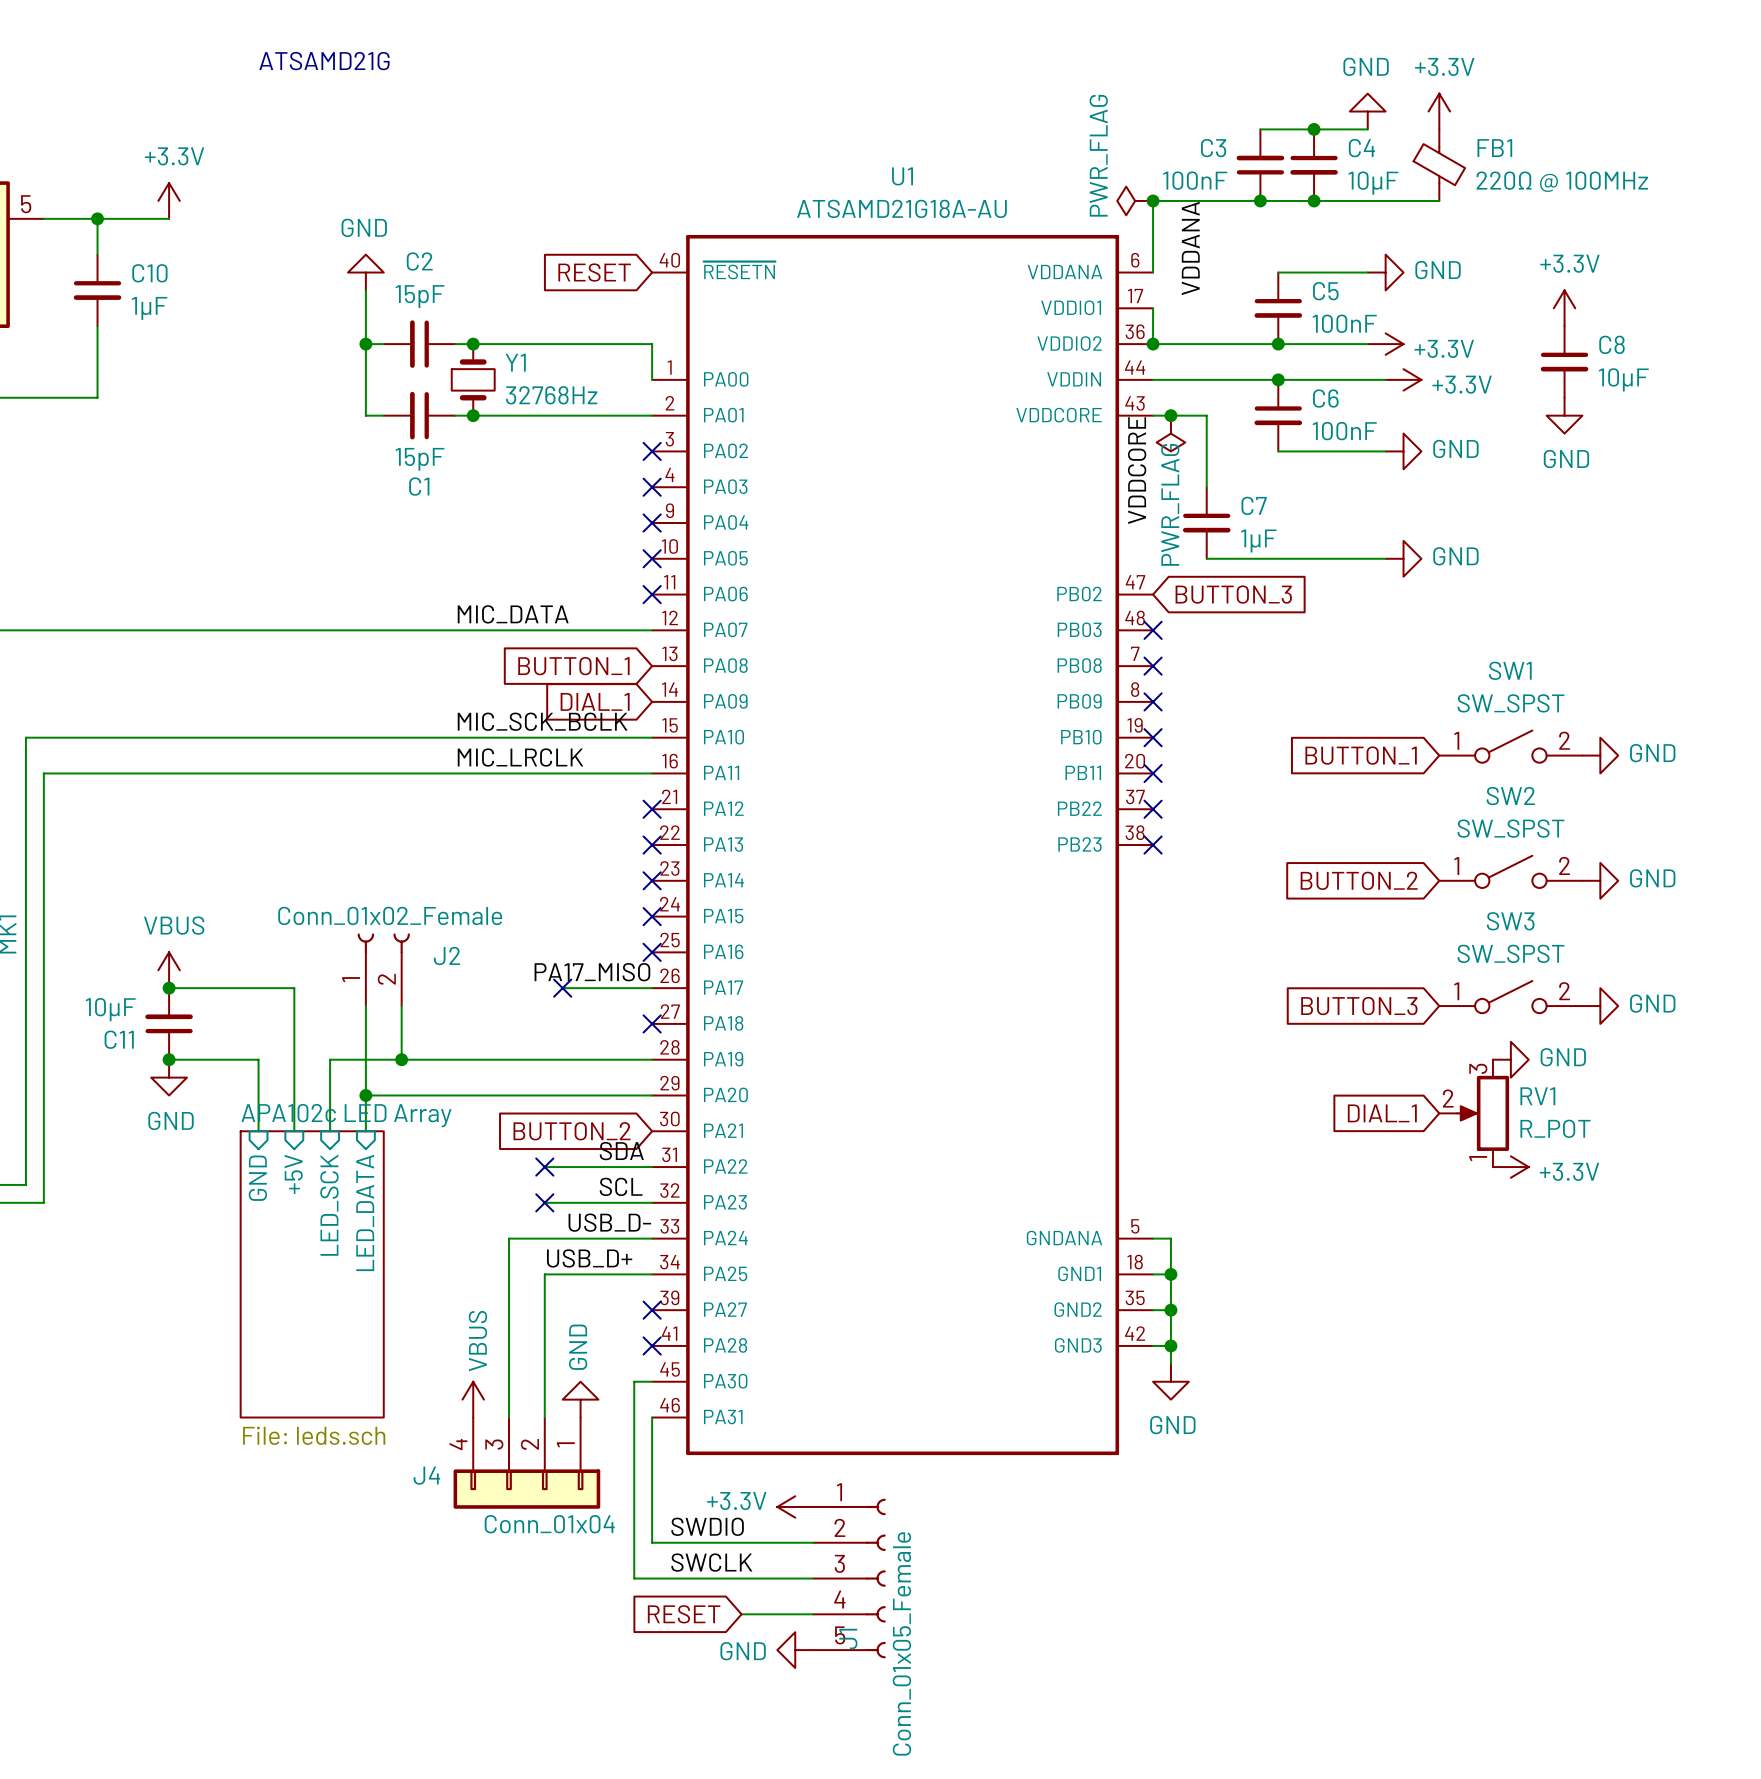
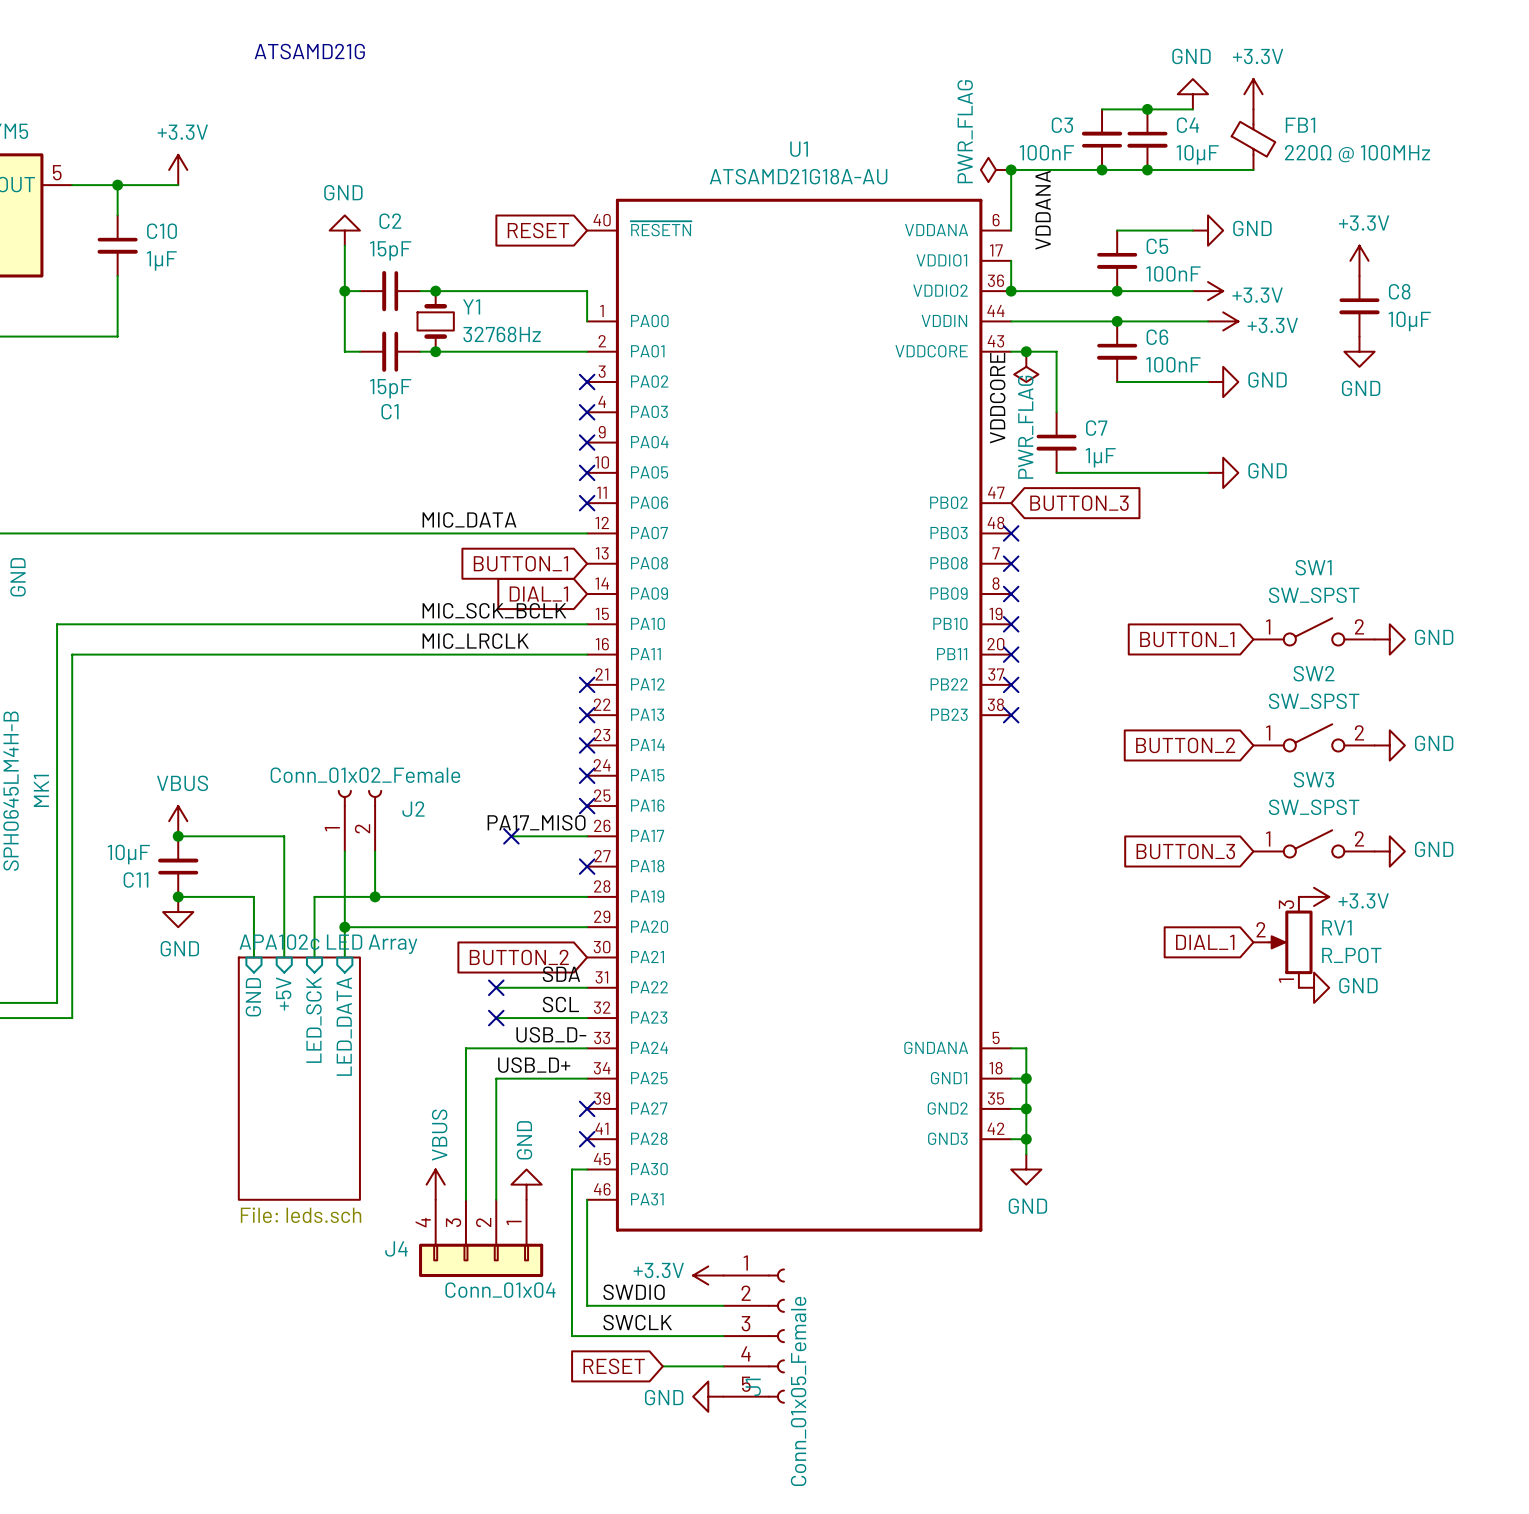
power symbol: GND (1510, 1059) -> +3.3V (1314, 896)
power symbol: +3.3V (1510, 1167) -> GND (1314, 987)

